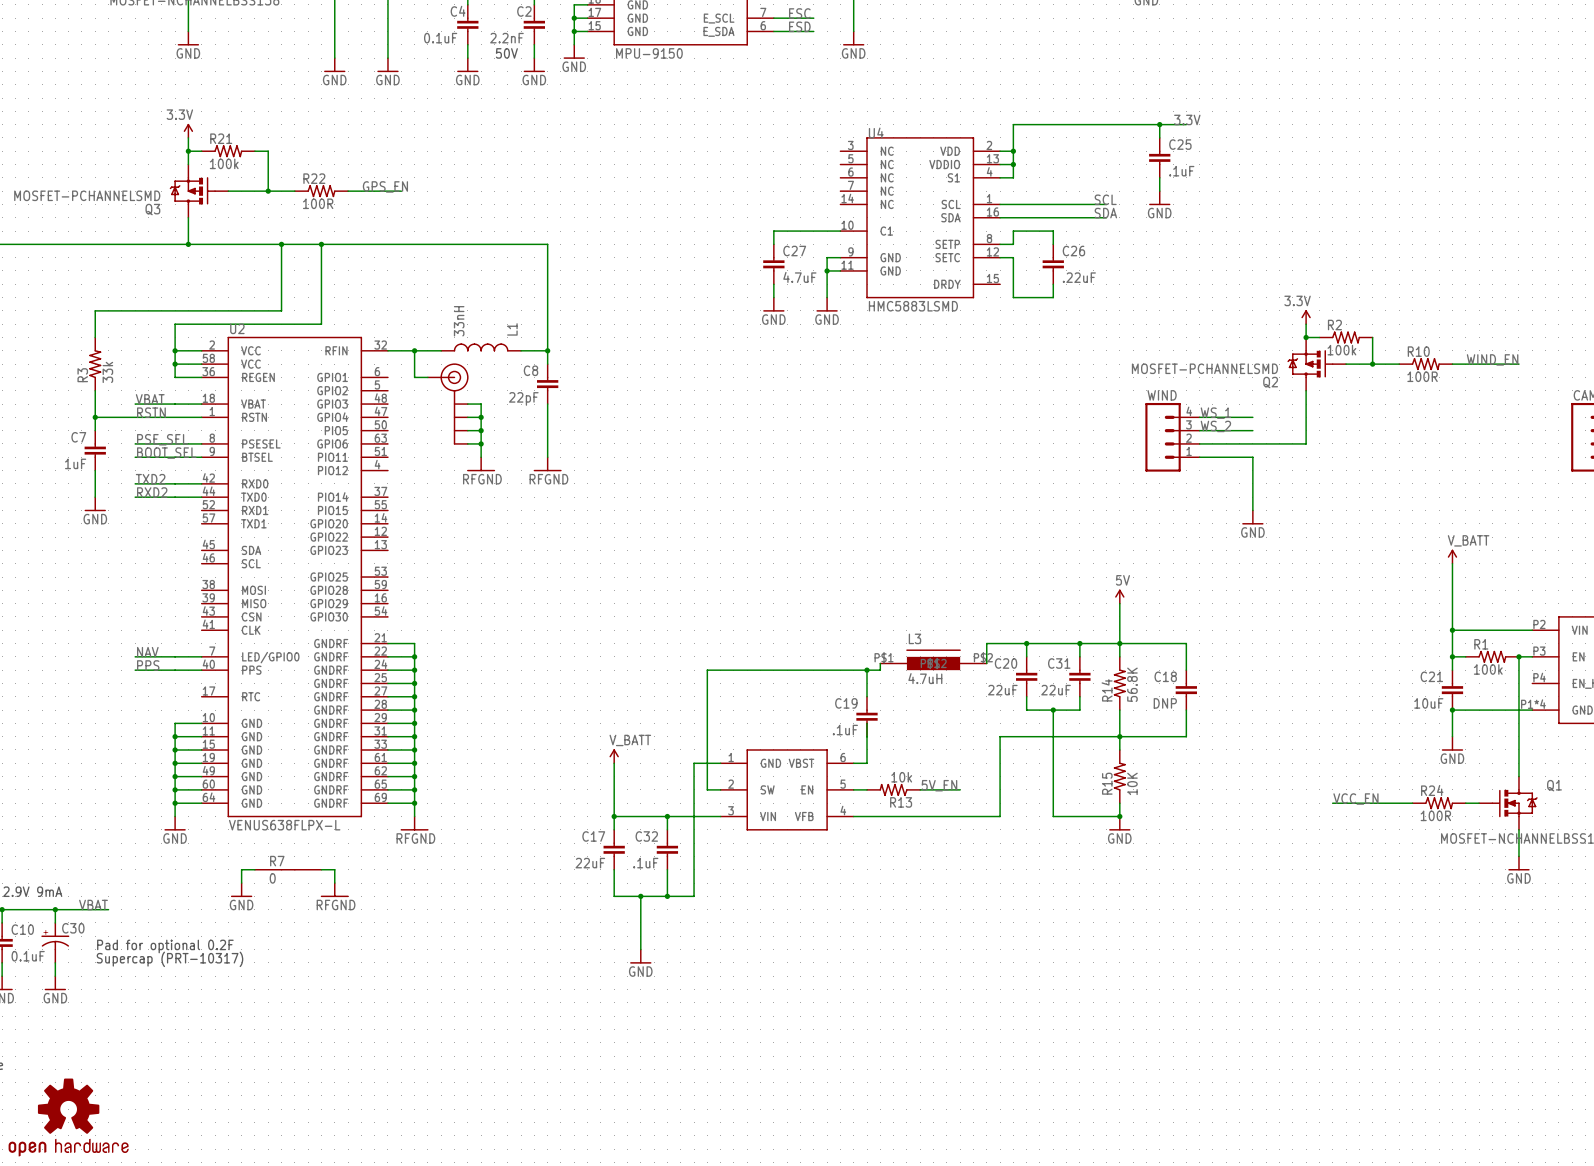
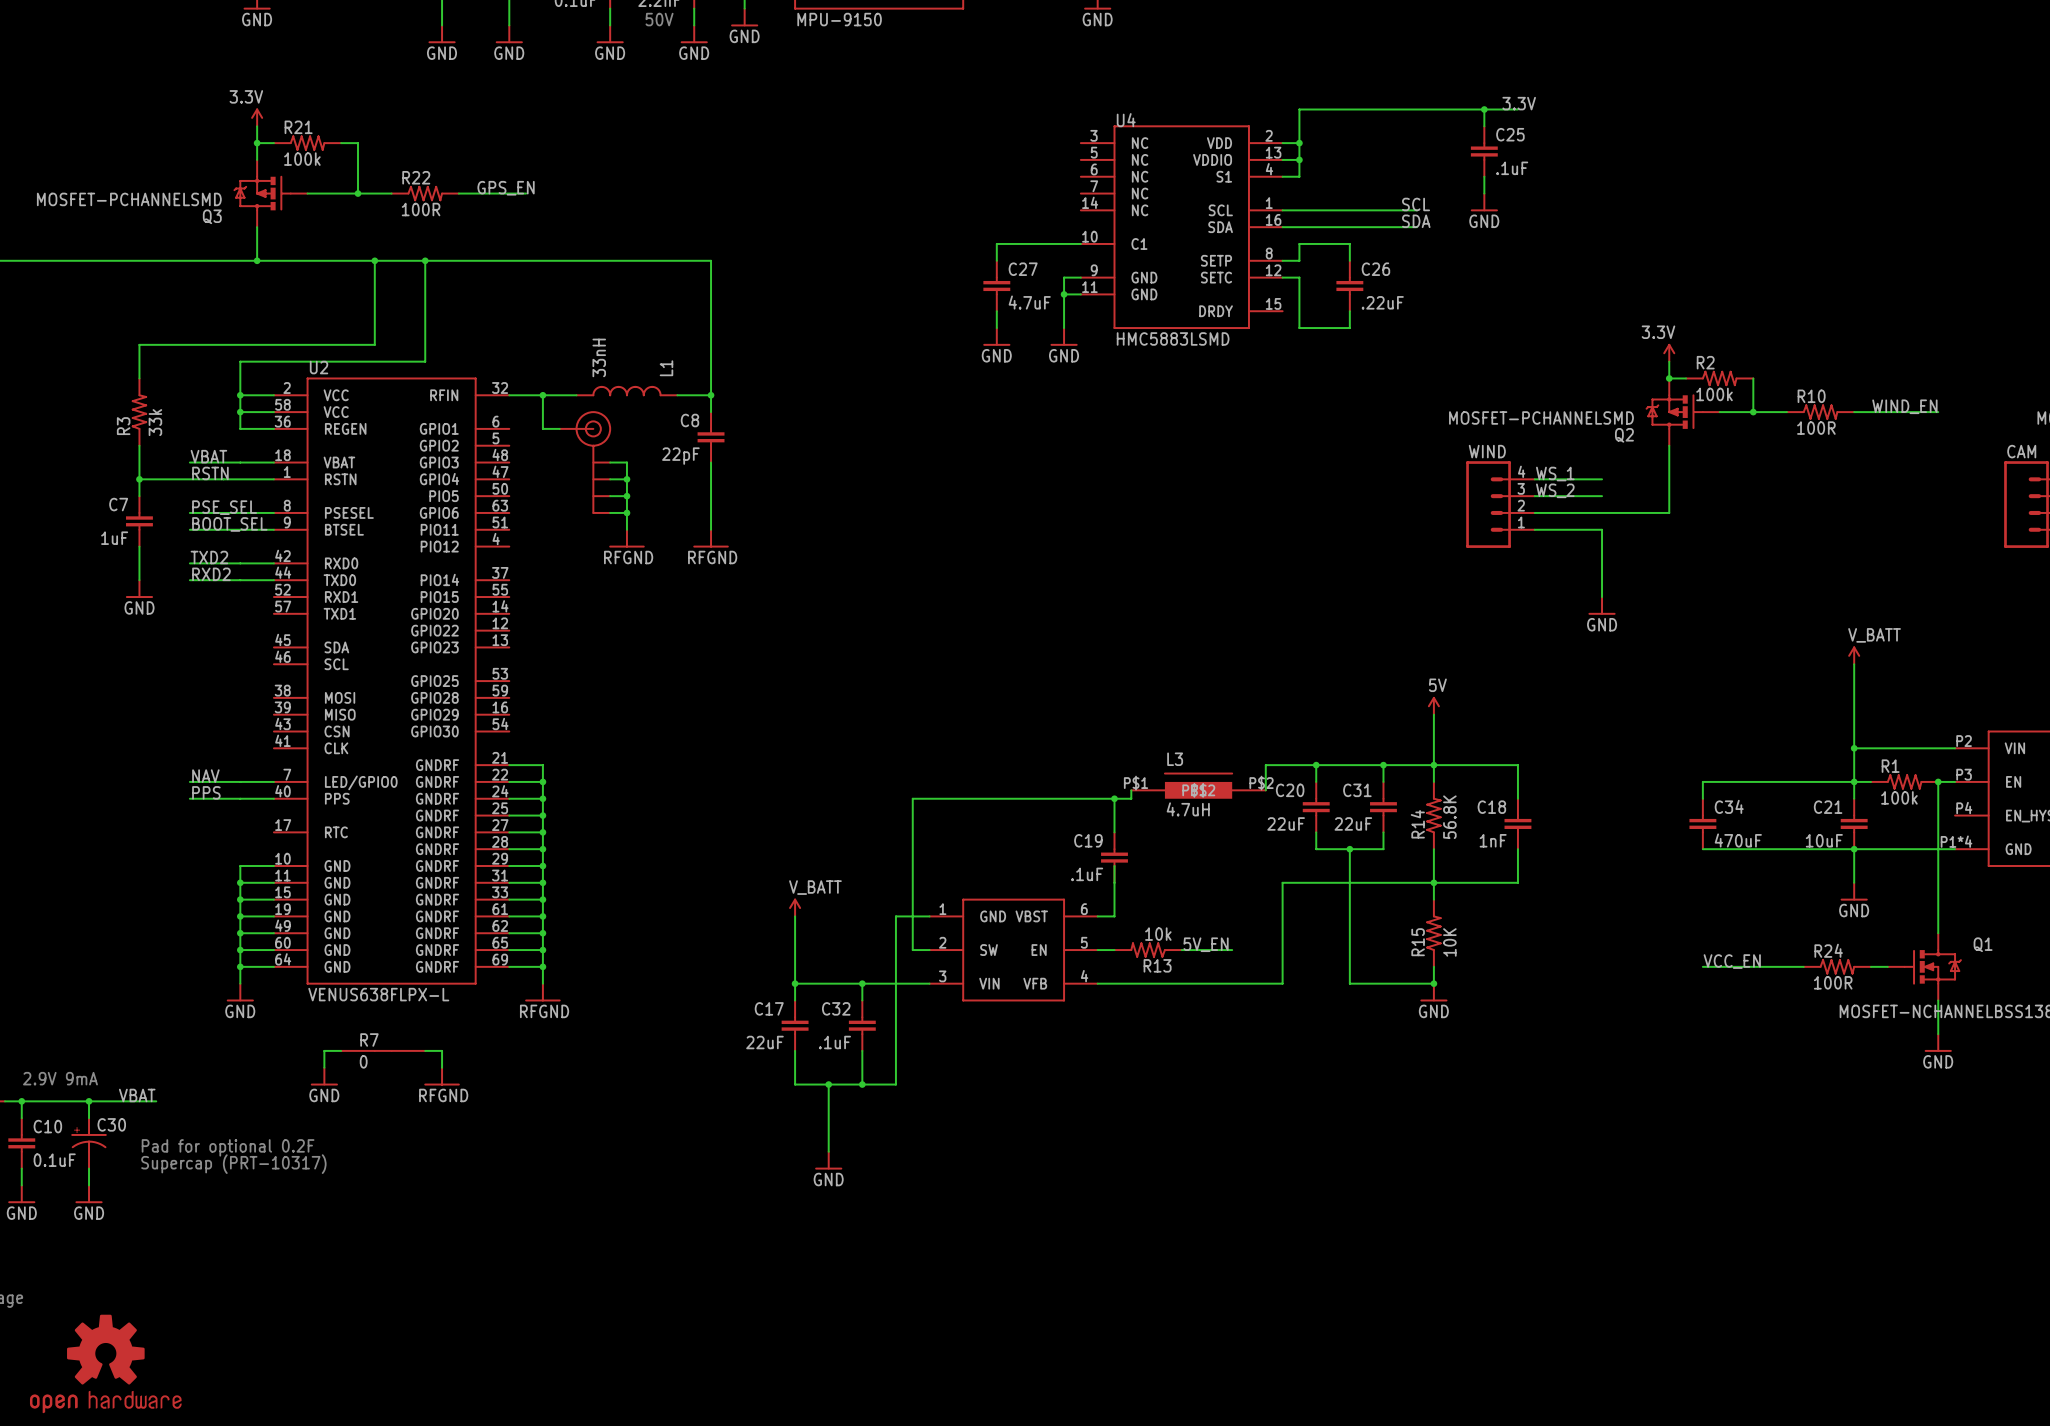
wire: none -> (1854, 781) (1702, 781) (1702, 798)
C34: none -> 470uF (1702, 823)
C18 value: DNP (1165, 703) -> 1nF (1493, 840)
wire: none -> (1702, 849) (1854, 849)

